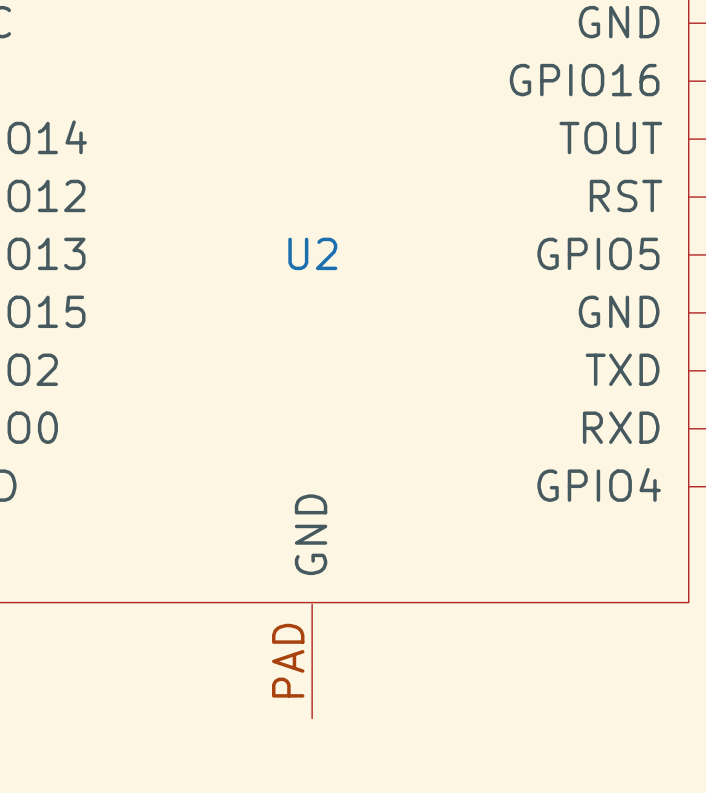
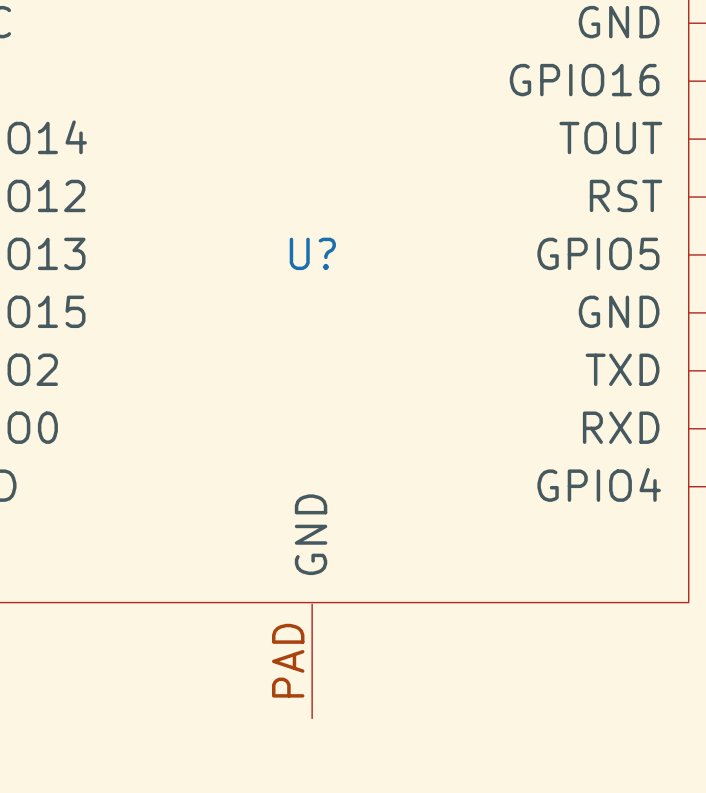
U2 name: U2 (312, 253) -> U? (312, 253)

